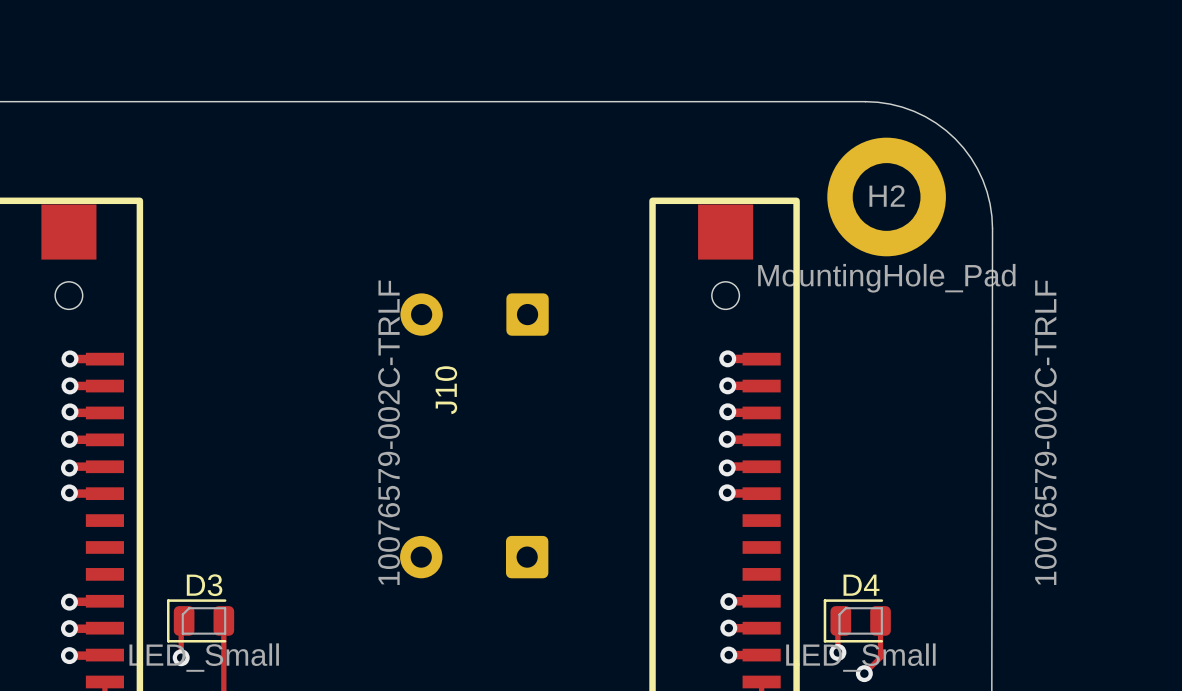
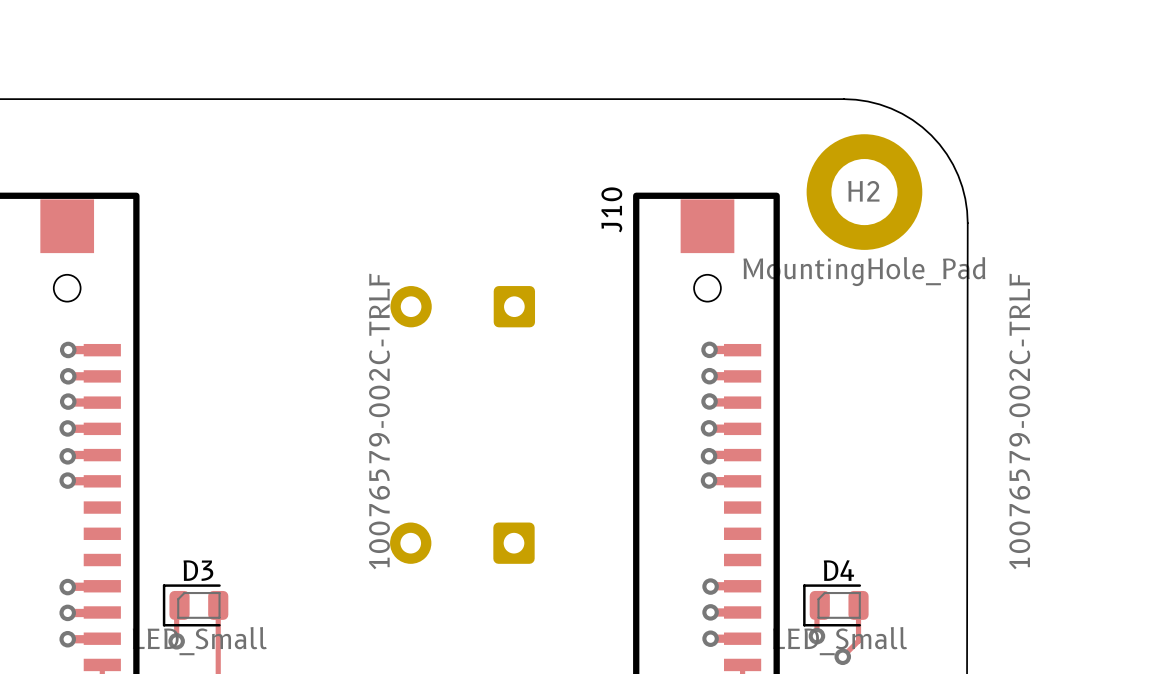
J10 name position: J10 (446, 390) -> J10 (611, 209)

